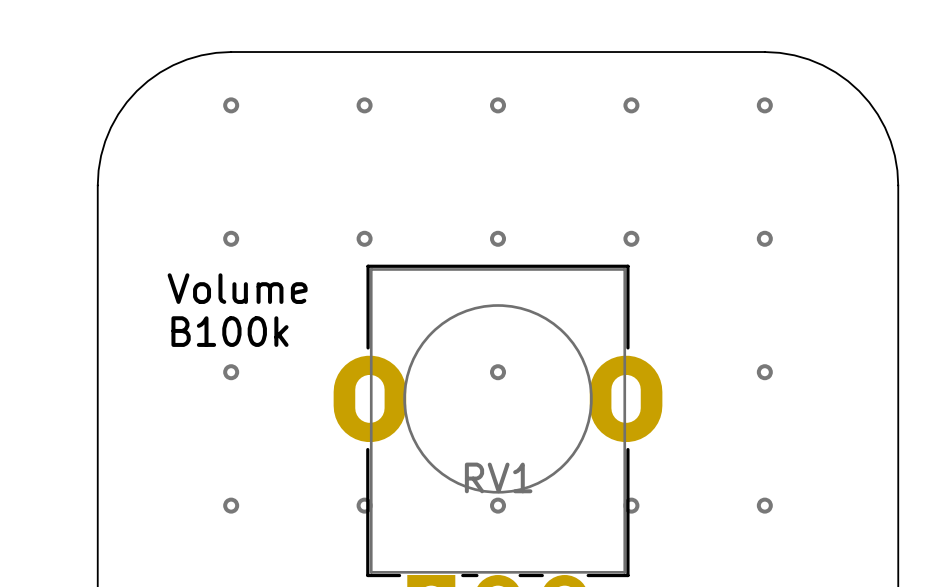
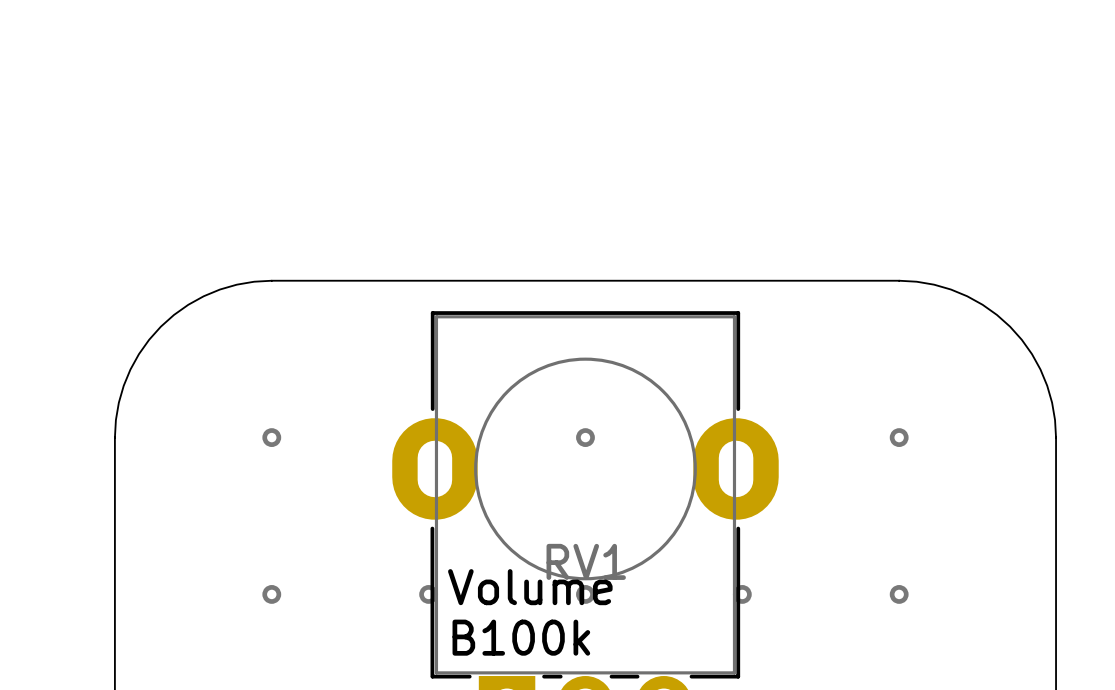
via: (231, 105) -> none
via: (364, 105) -> none
via: (498, 105) -> none
via: (631, 105) -> none
via: (764, 105) -> none
via: (231, 238) -> none
via: (364, 238) -> none
via: (498, 238) -> none
via: (631, 238) -> none
via: (764, 238) -> none
text position: Volume (237, 288) -> Volume (530, 587)
text position: B100k (229, 331) -> B100k (521, 637)
board edge: (97, 372) (97, 185) (101, 155) (110, 127) (126, 102) (136, 91) (160, 72) (187, 59) (201, 55) (231, 52) (764, 52) (794, 55) (822, 65) (848, 81) (869, 102) (885, 127) (894, 155) (898, 185) (898, 372) -> (114, 437) (115, 420) (123, 385) (138, 354) (160, 326) (188, 304) (219, 289) (236, 284) (271, 280) (899, 280) (934, 284) (967, 296) (982, 304) (1010, 326) (1021, 339) (1031, 354) (1047, 385) (1052, 402) (1056, 437)

